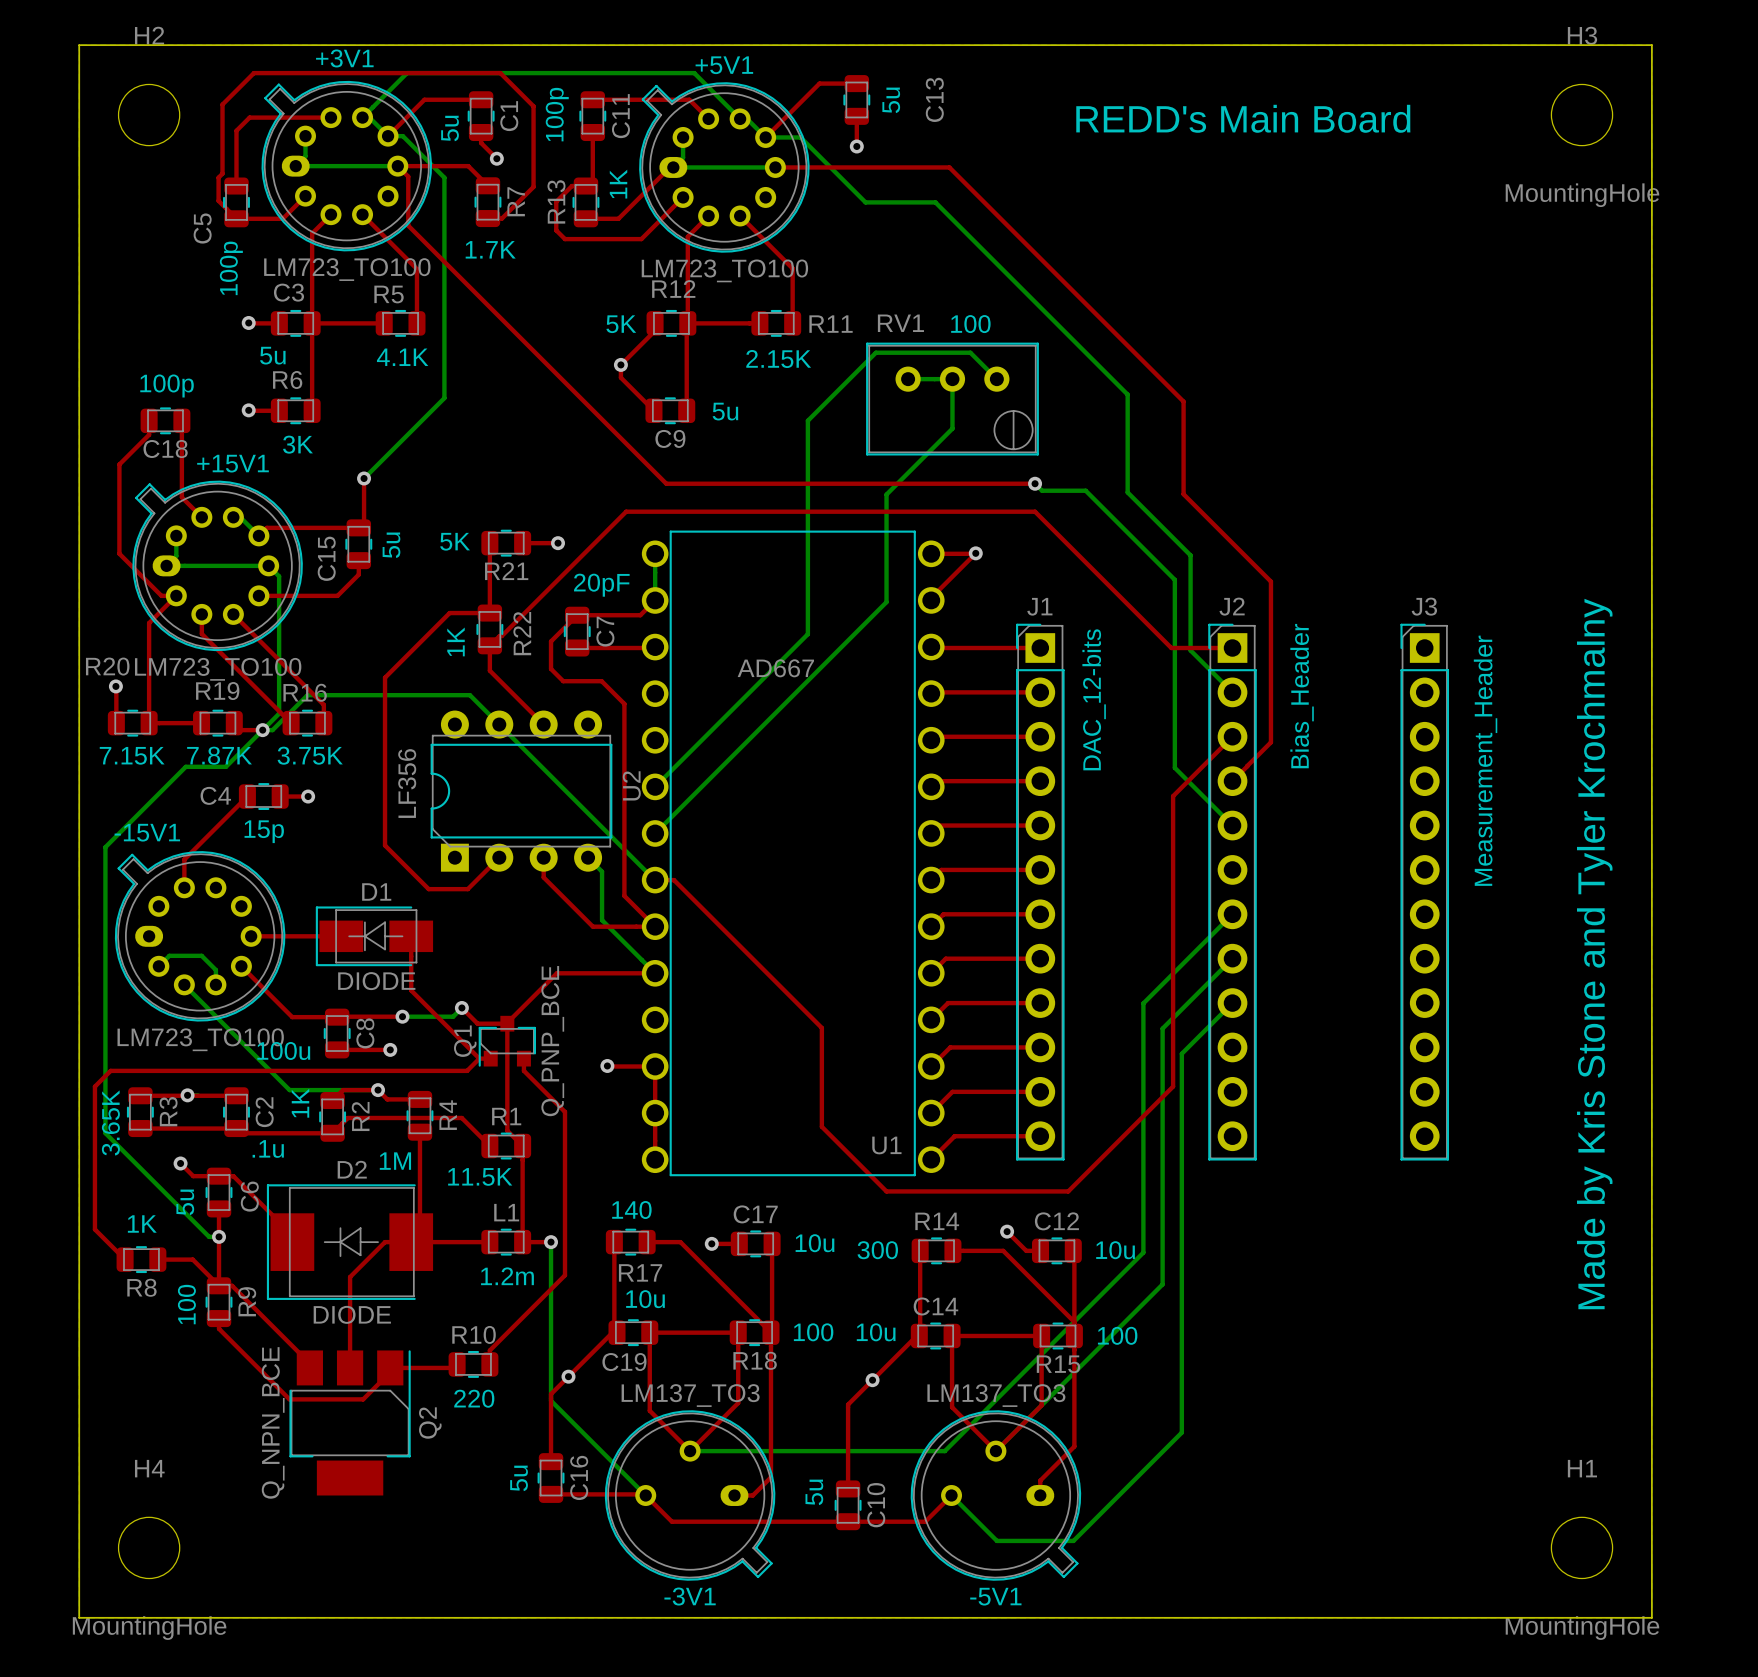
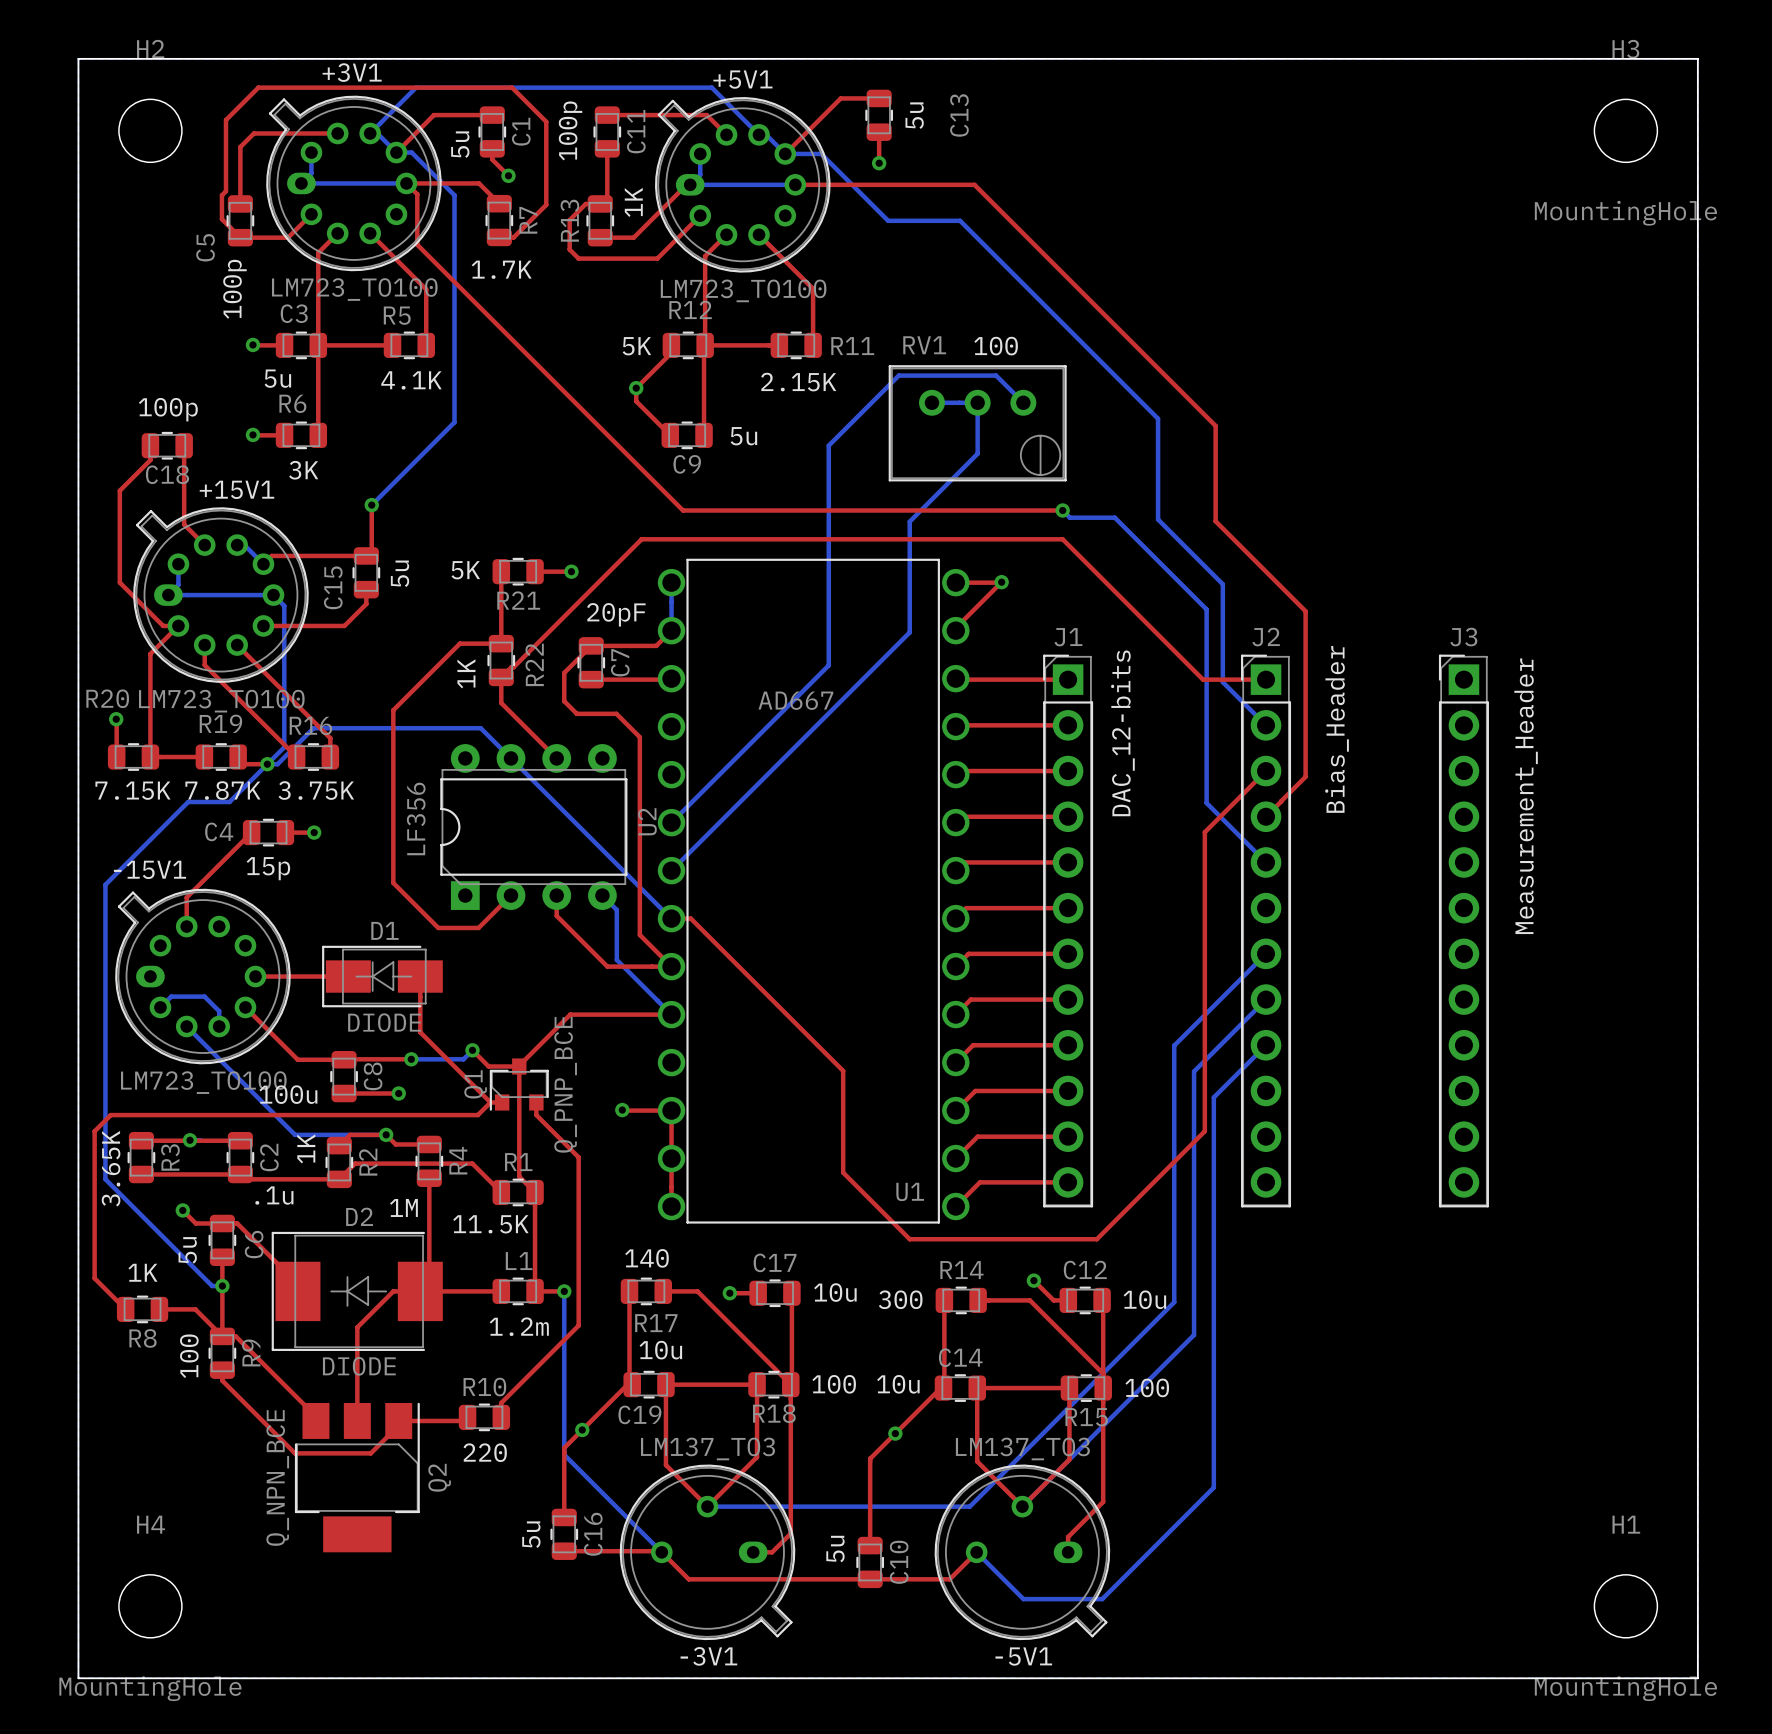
text: REDD's Main Board (1243, 118) -> none
text: Made by Kris Stone and Tyler Krochmalny (1594, 954) -> none

